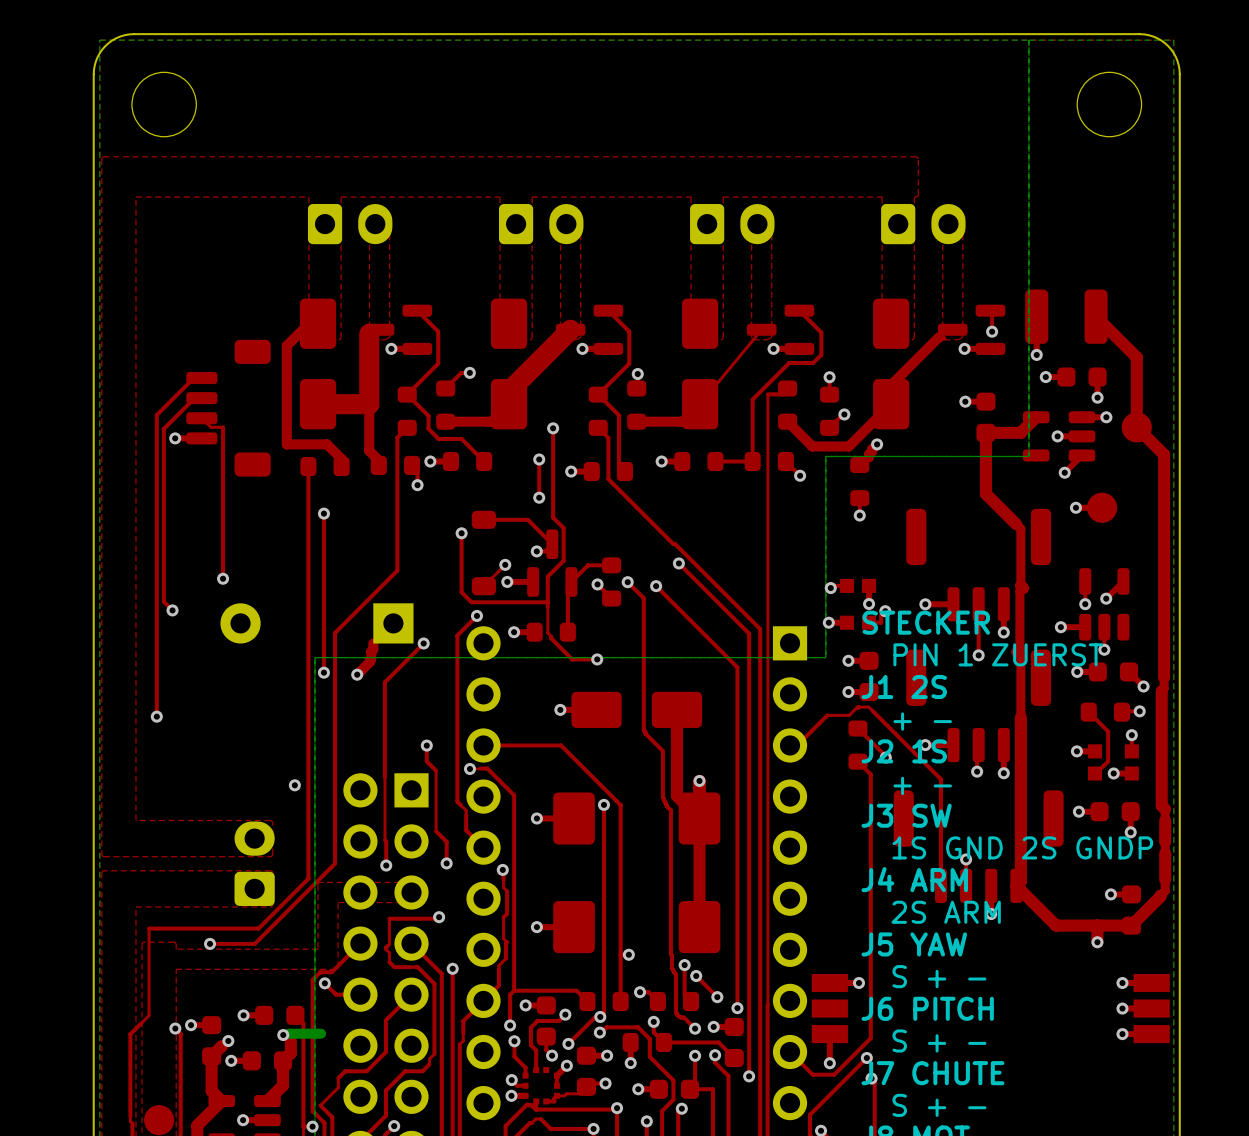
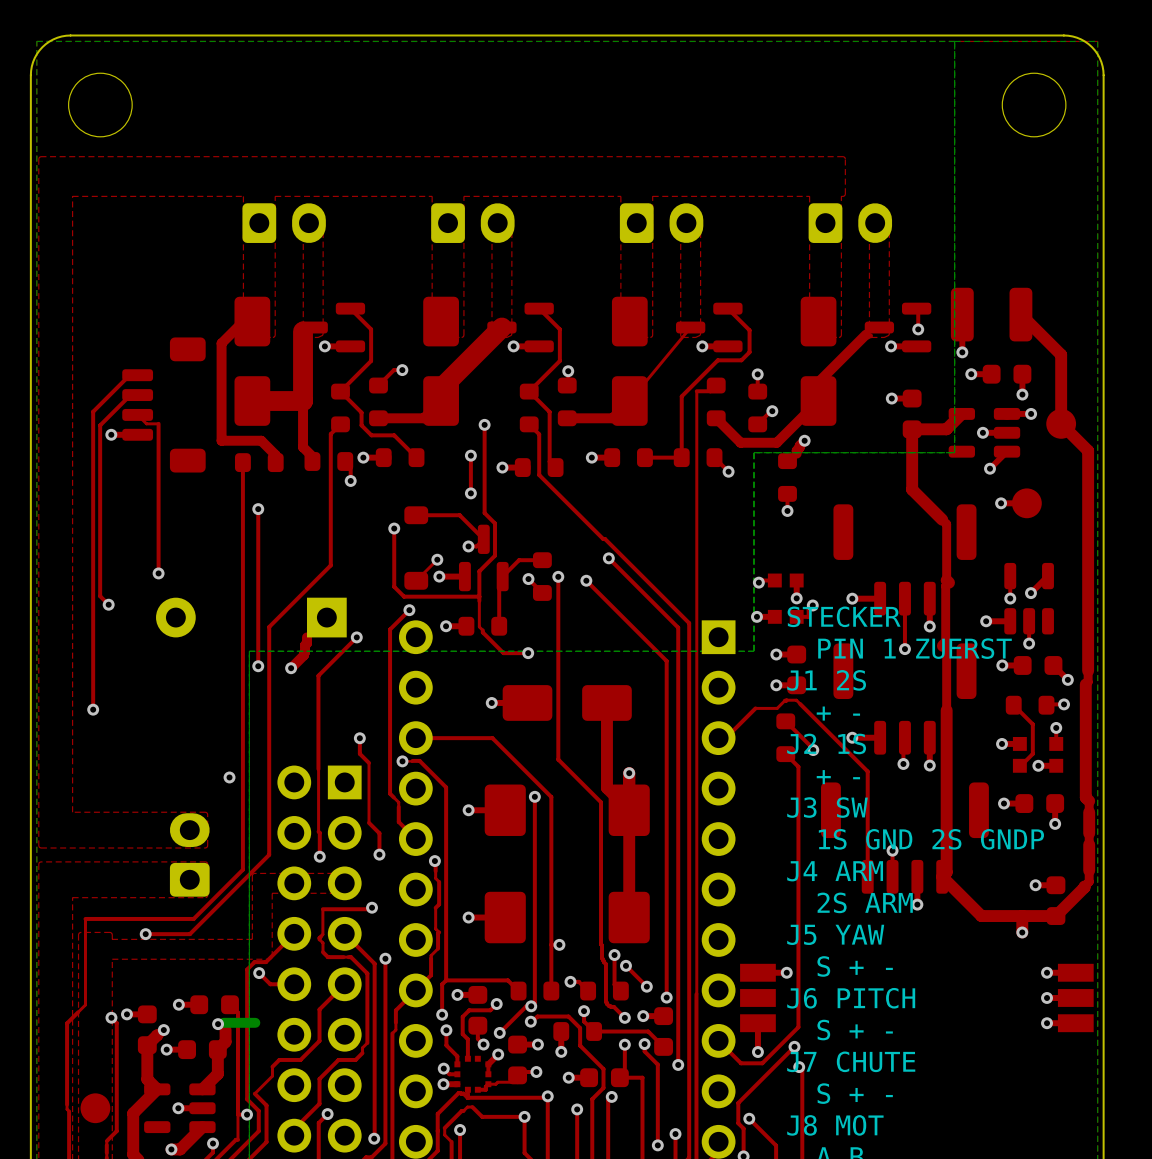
top track: (627, 582) (643, 598) (643, 730) (662, 751) (662, 797) (666, 806) -> (558, 576) (558, 759) (597, 798)

